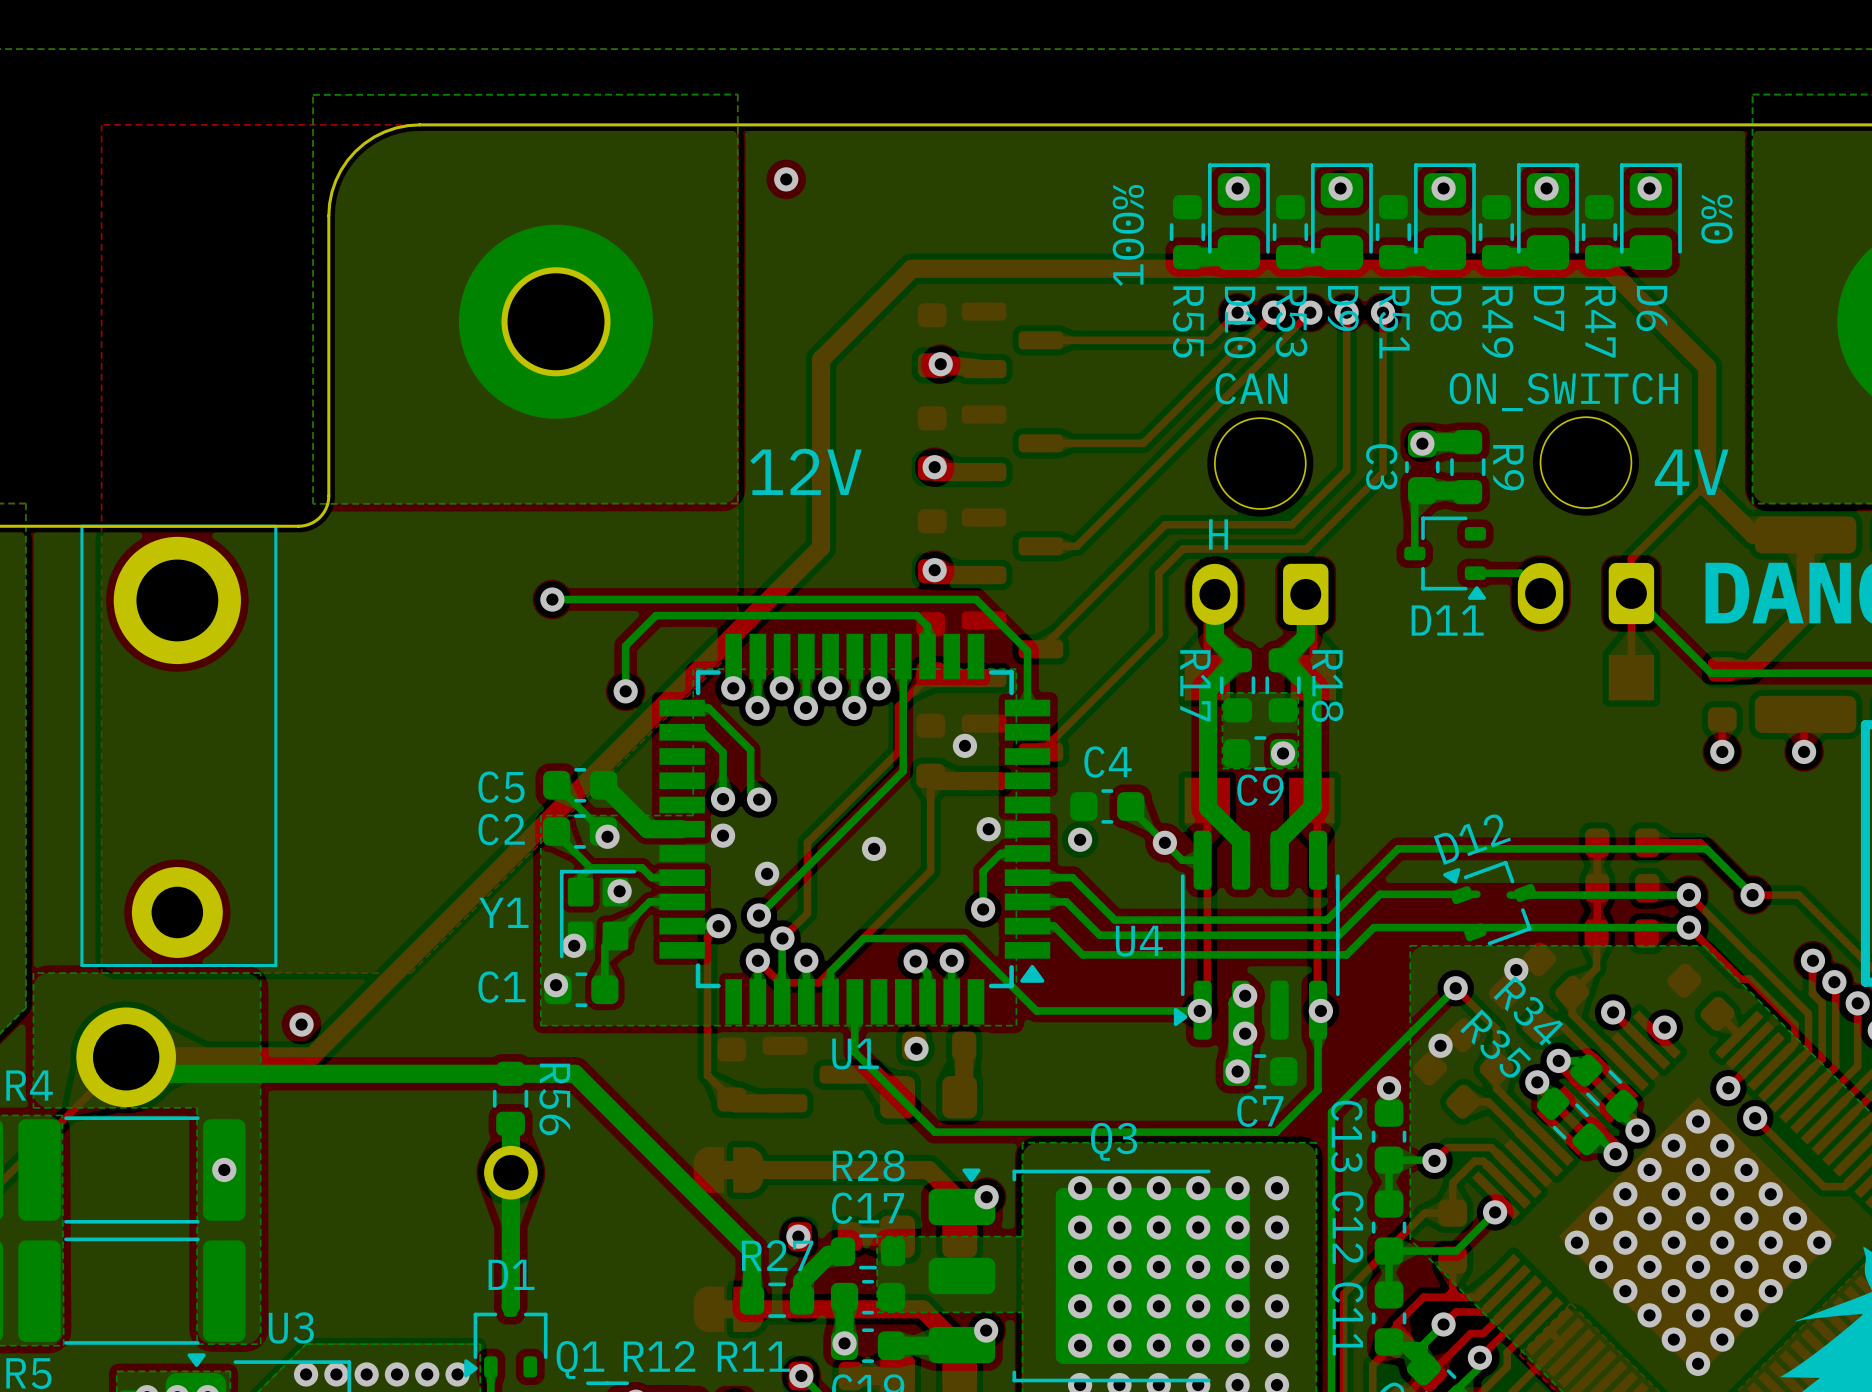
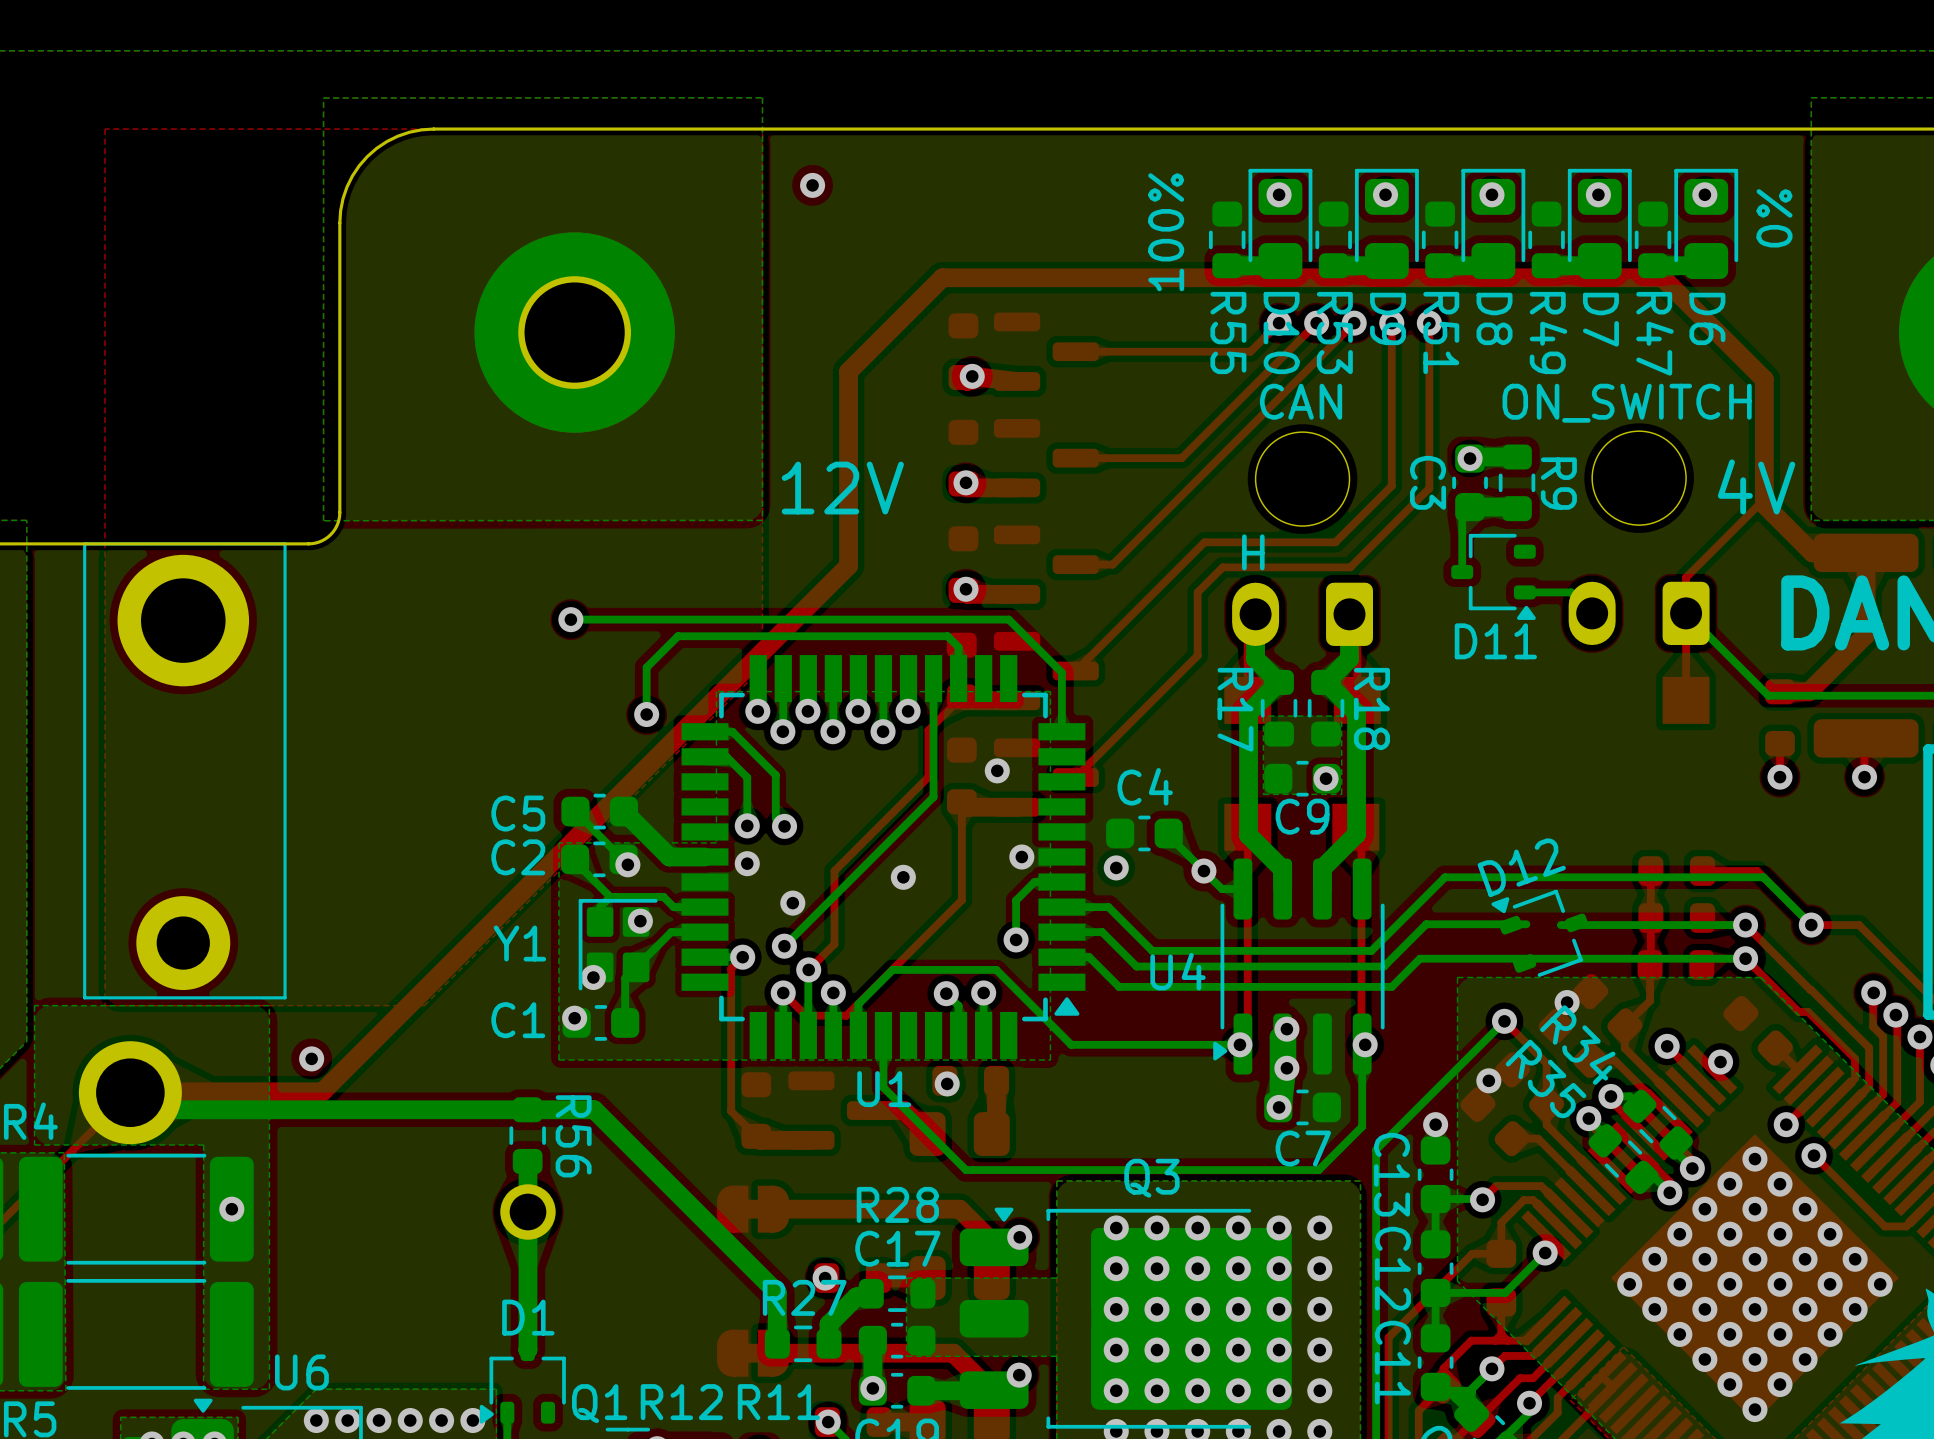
U3 name: U3 (291, 1327) -> U6 (301, 1372)

